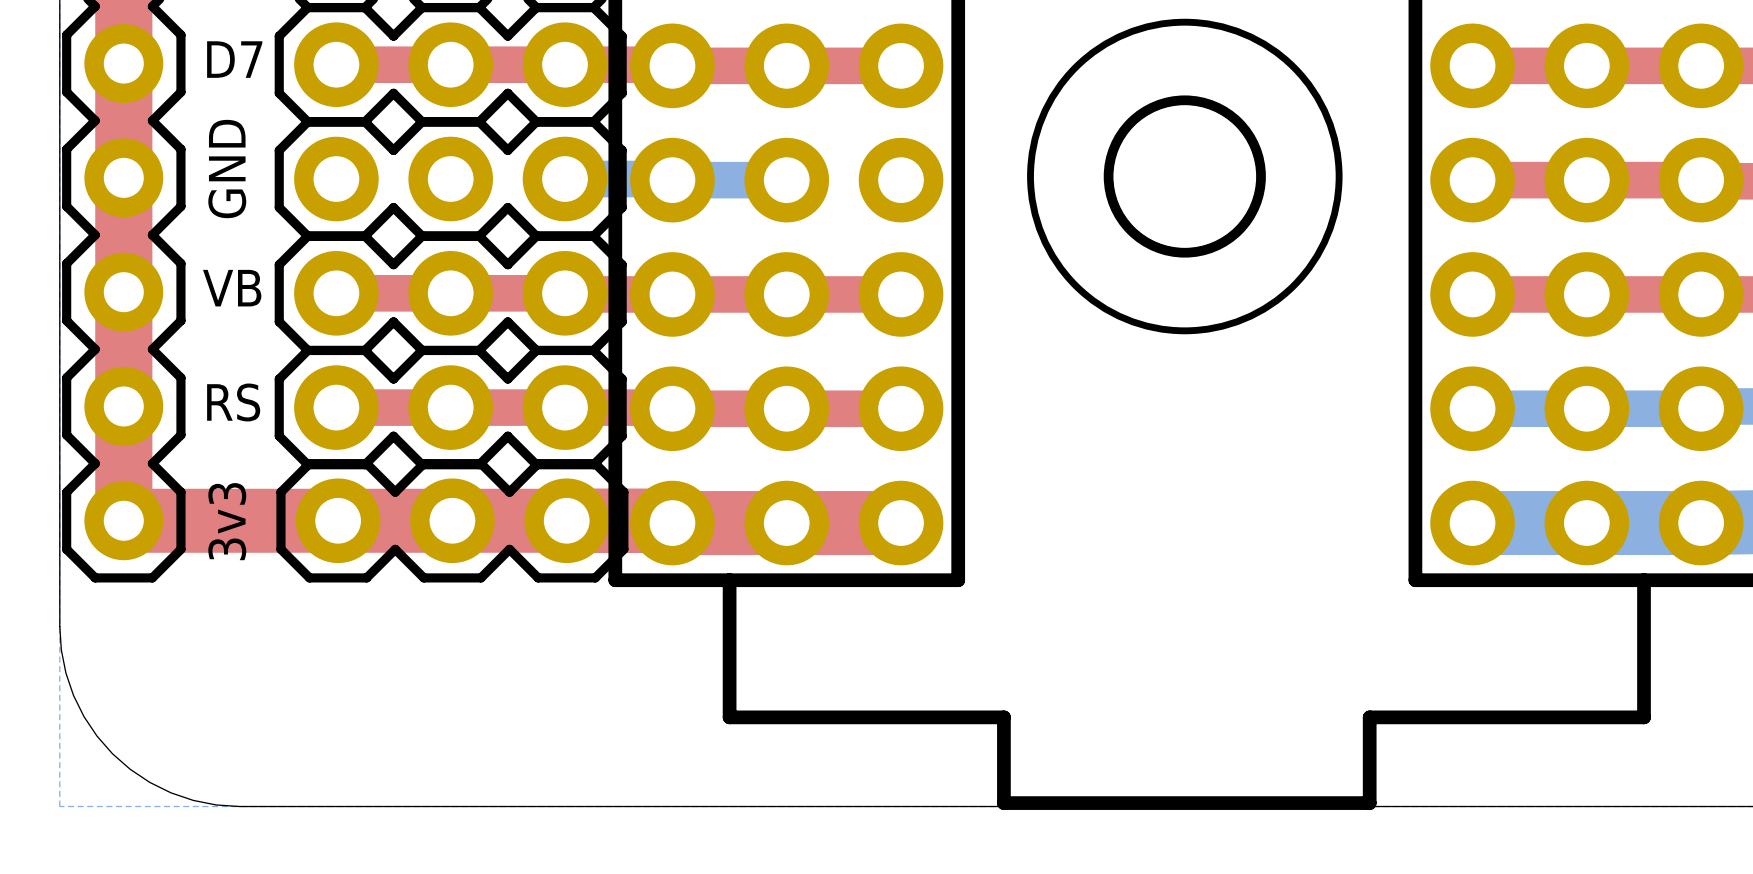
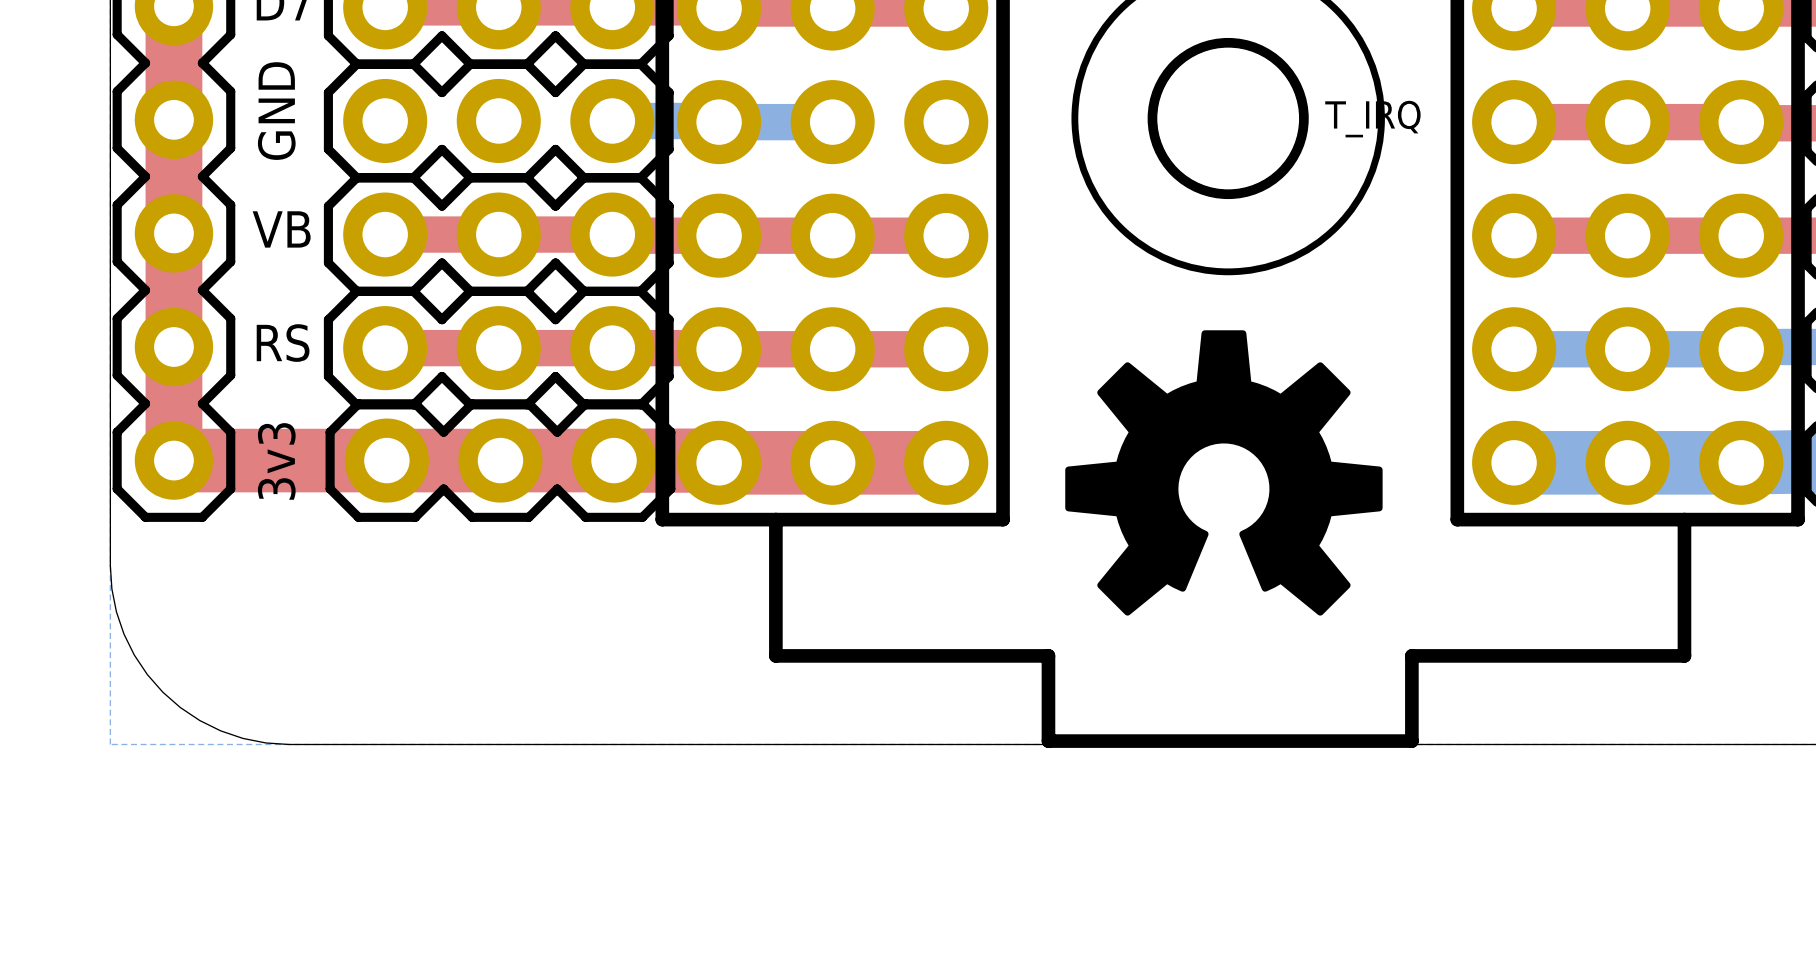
text: none -> T_IRQ (1372, 119)
drawing: none -> [1065, 330, 1383, 616]

